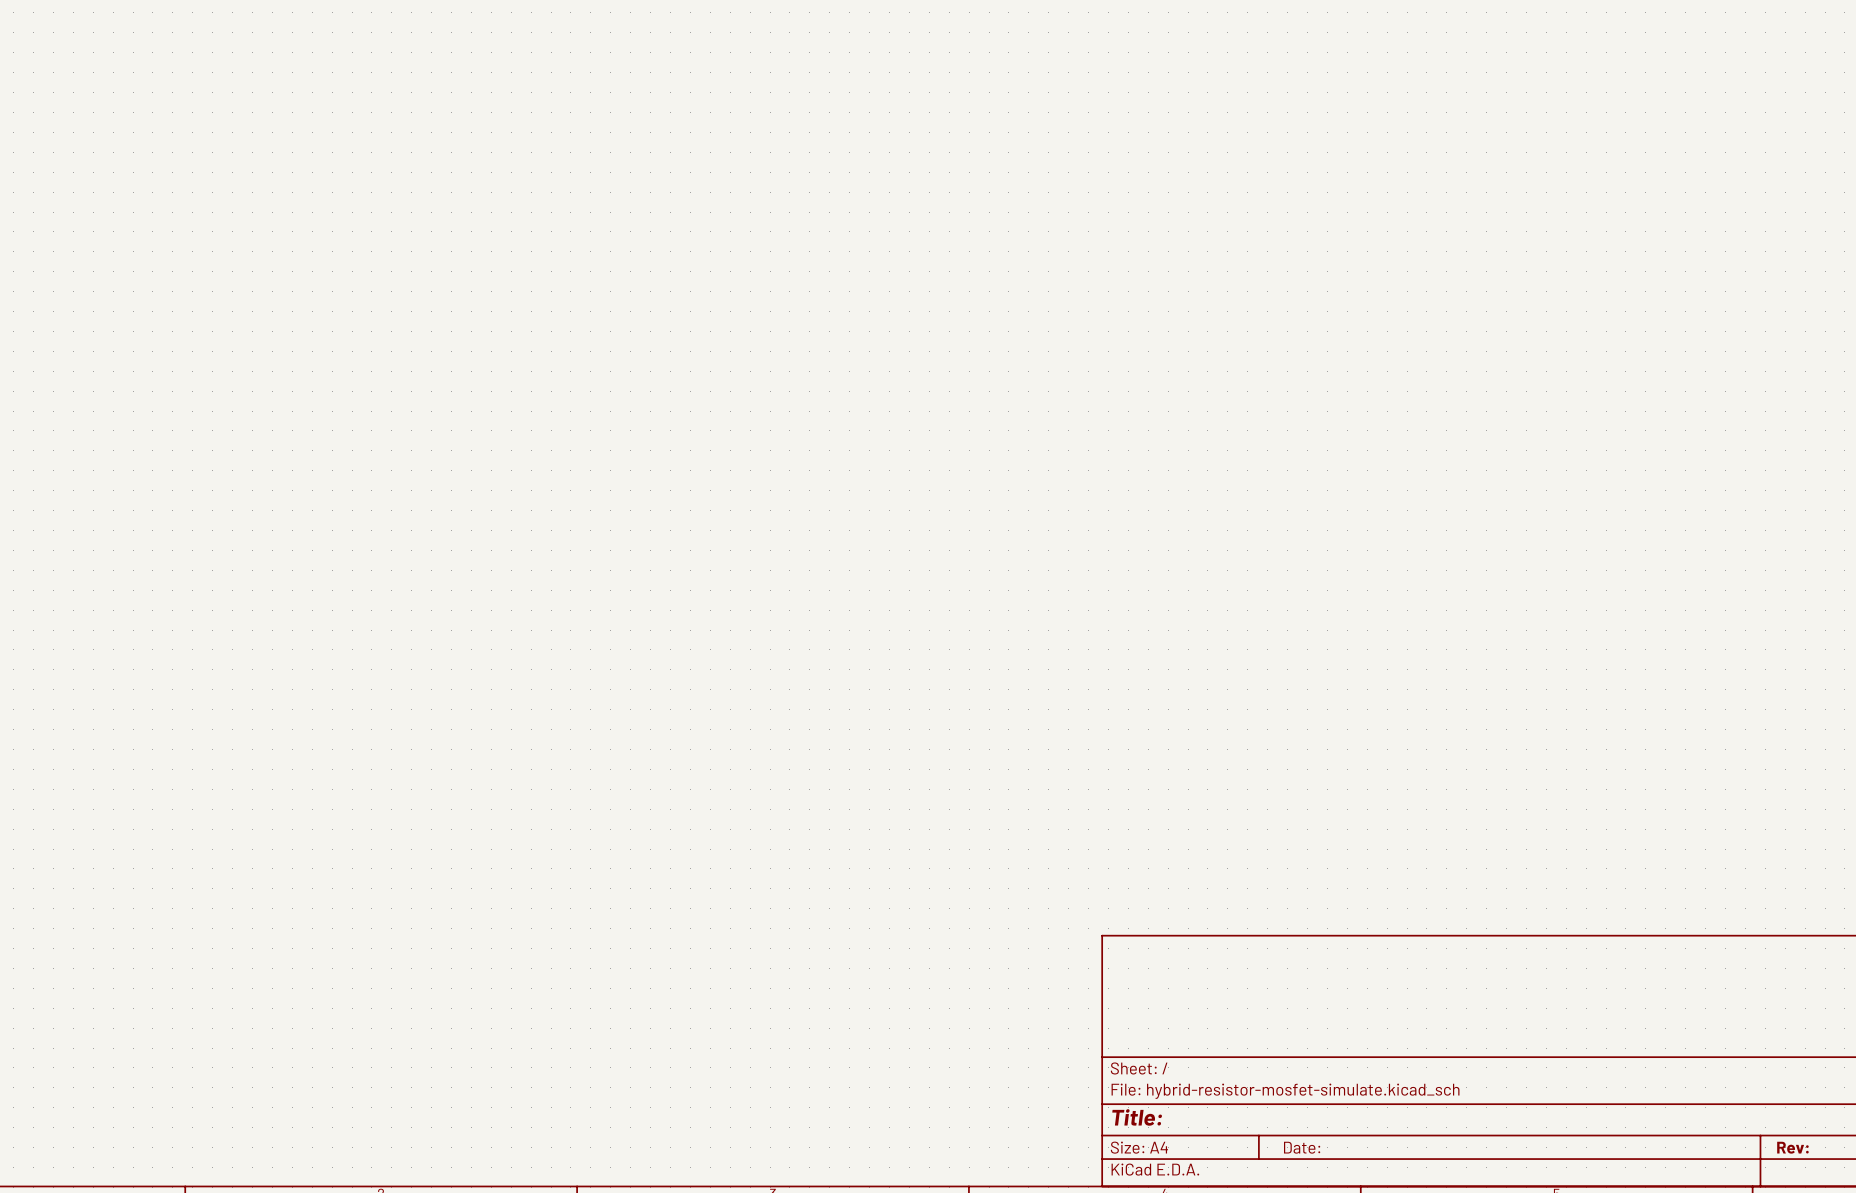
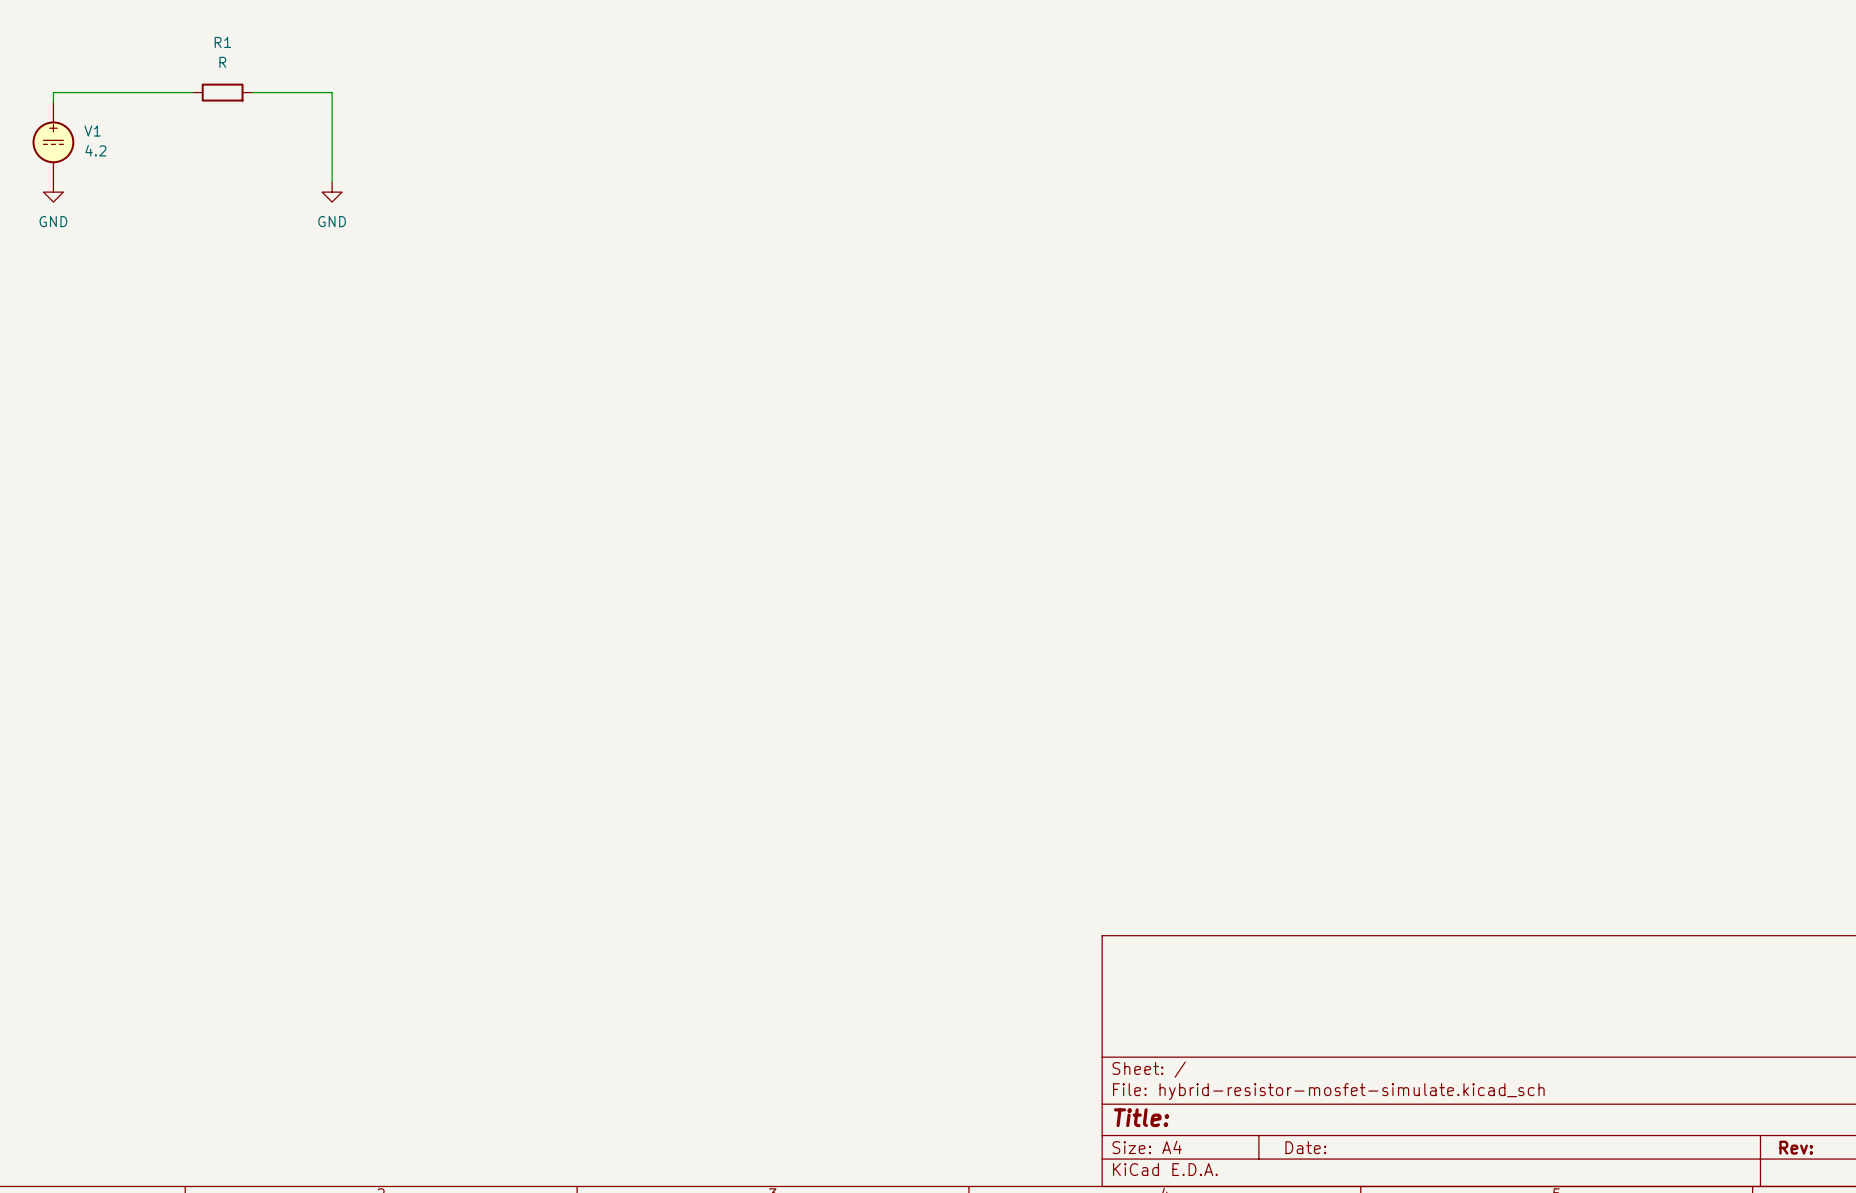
wire: none -> (192, 92) (53, 92) (53, 102)
R1: none -> R (222, 92)
wire: none -> (252, 92) (332, 92) (332, 182)
V1: none -> 4.2 (53, 142)
power symbol: none -> GND (53, 192)
power symbol: none -> GND (332, 192)

